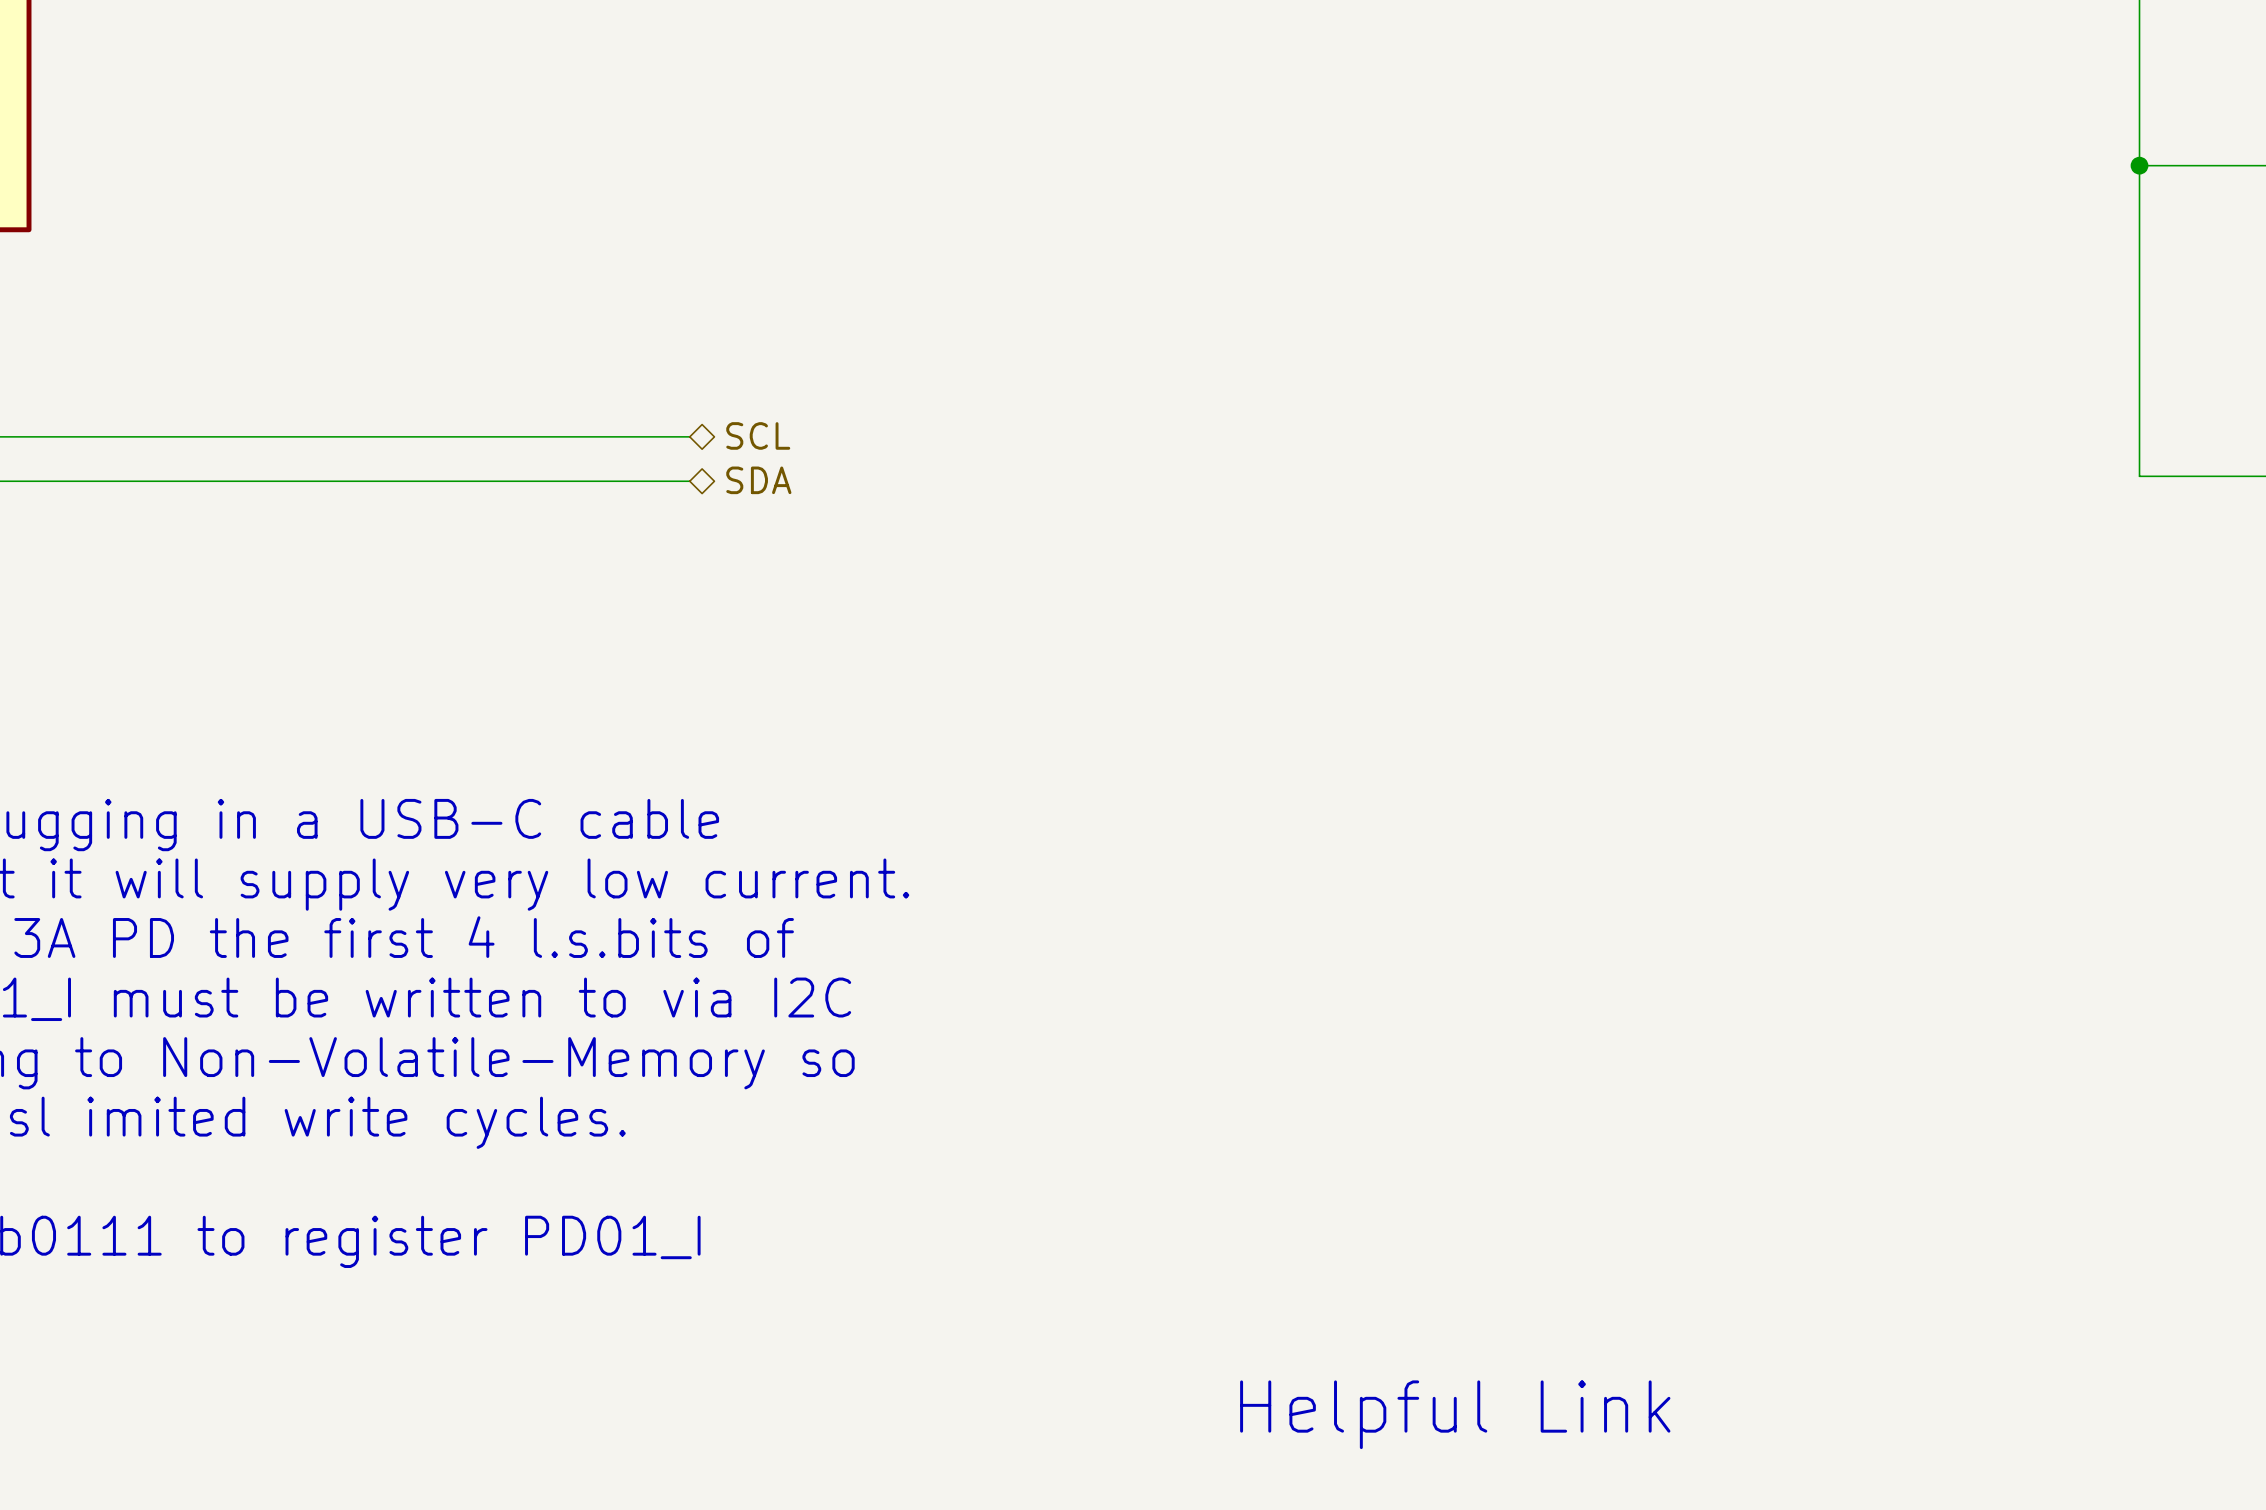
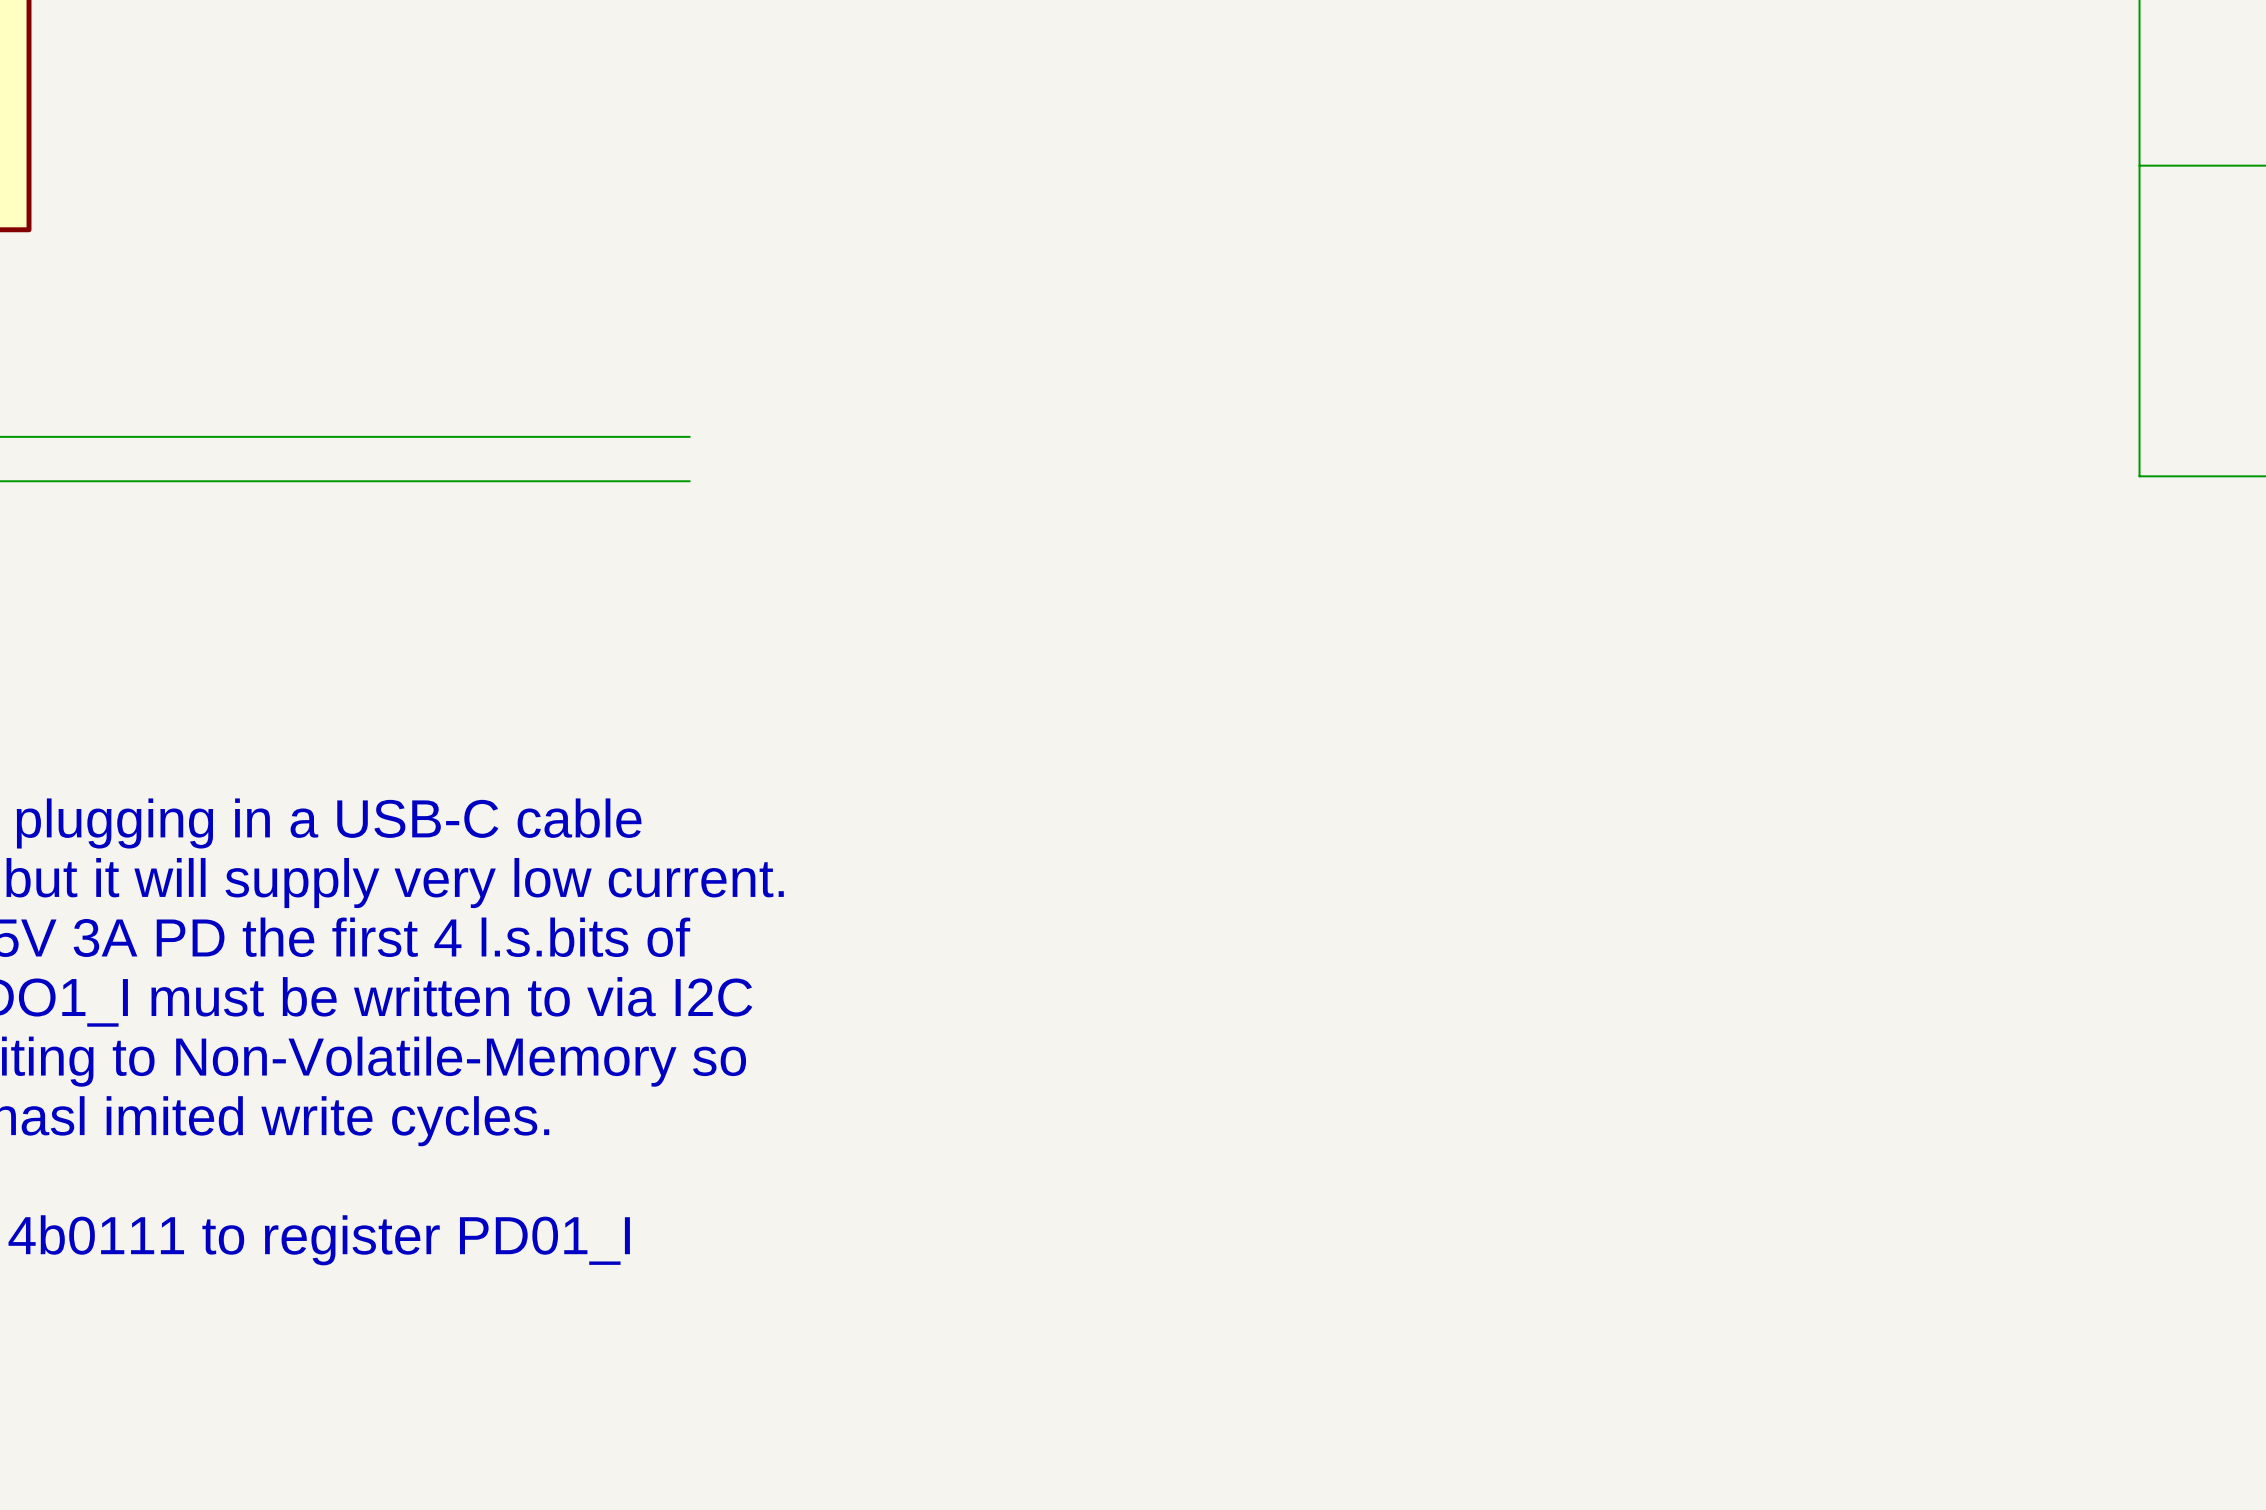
junction: (2139, 165) -> none
hierarchical label: SCL (758, 435) -> none
hierarchical label: SDA (758, 480) -> none
text: Helpful Link (1455, 1414) -> none

